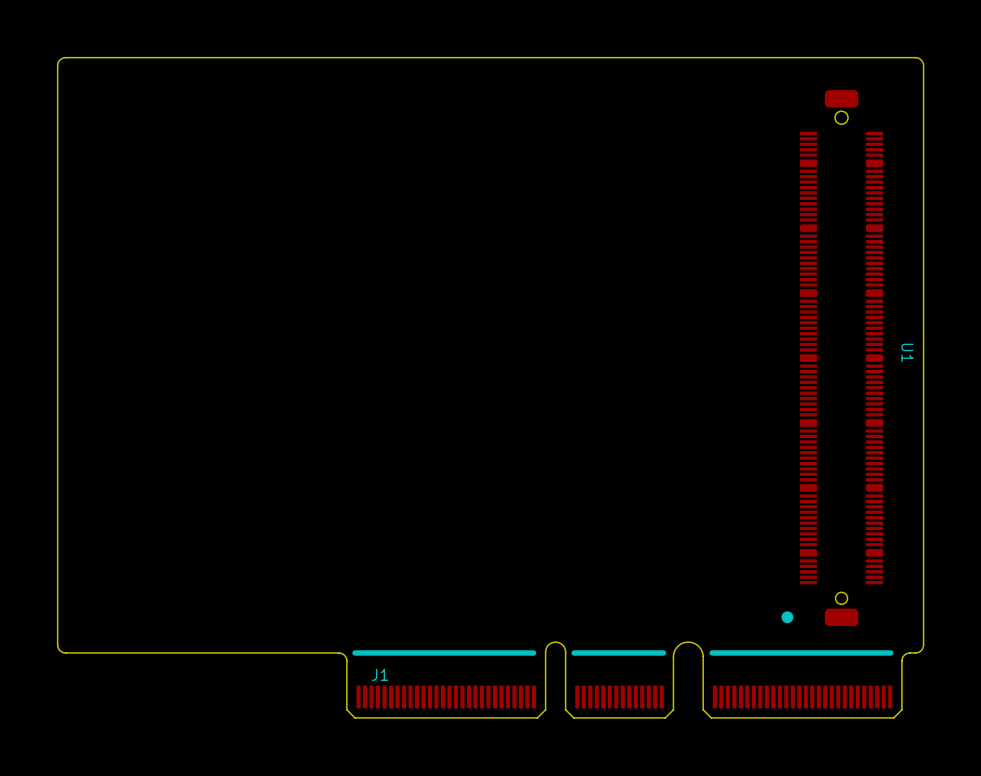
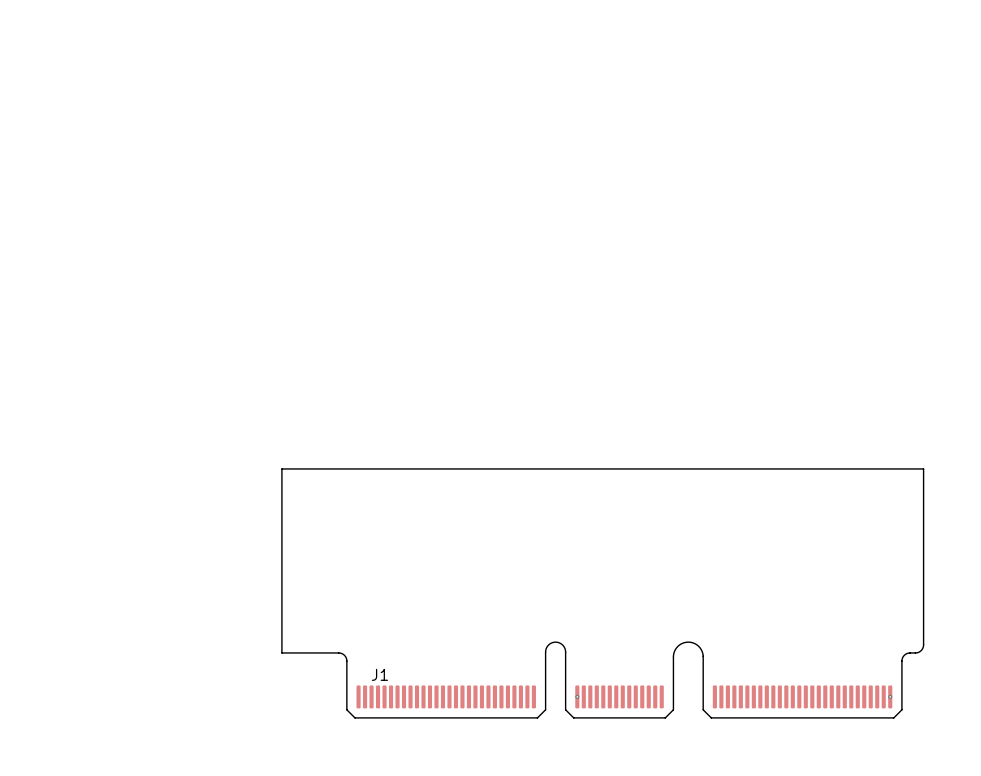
U1: (832, 358) -> none
board edge: (923, 468) (923, 65) (918, 58) (62, 58) (57, 65) (58, 647) (65, 652) (281, 652) -> (923, 468) (281, 468) (281, 652)
line: (354, 652) (533, 652) -> none
line: (574, 652) (663, 652) -> none
line: (712, 652) (890, 652) -> none
via: none -> (577, 696)
via: none -> (890, 696)

